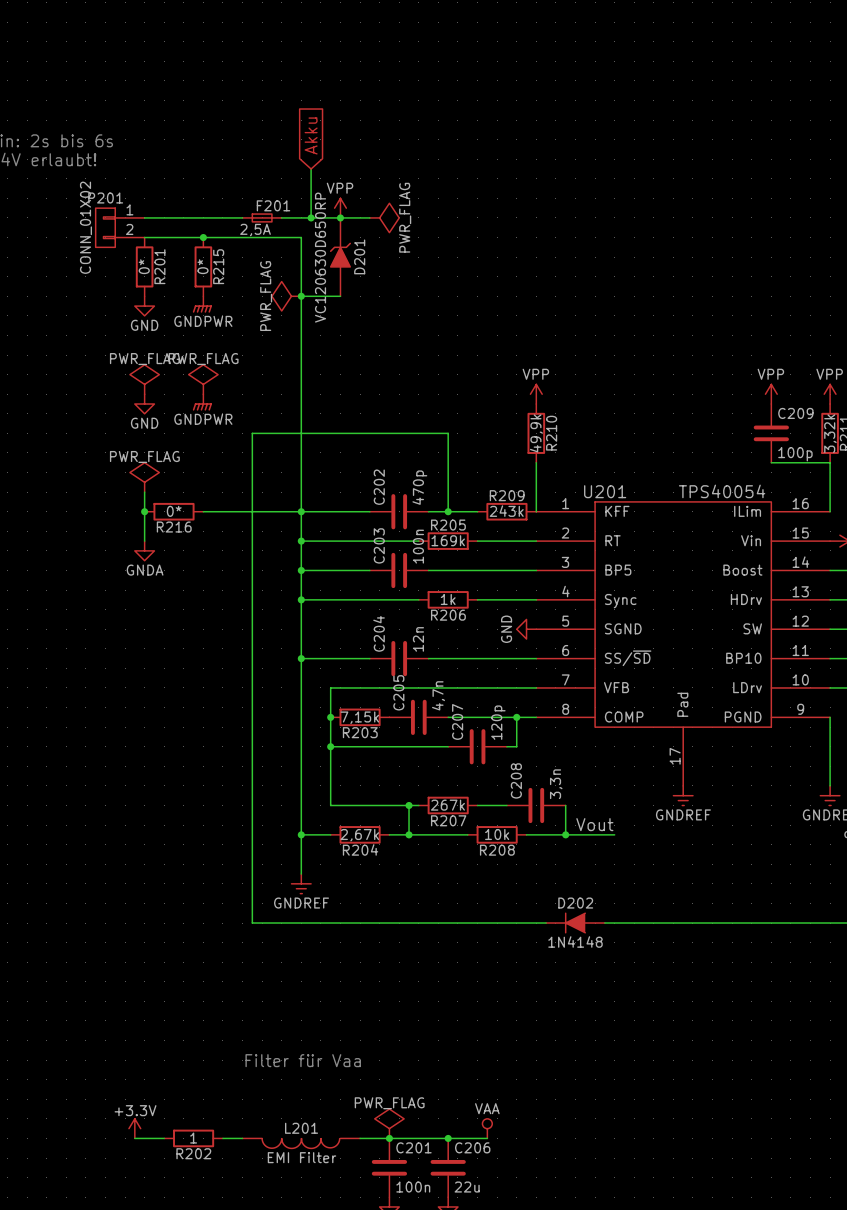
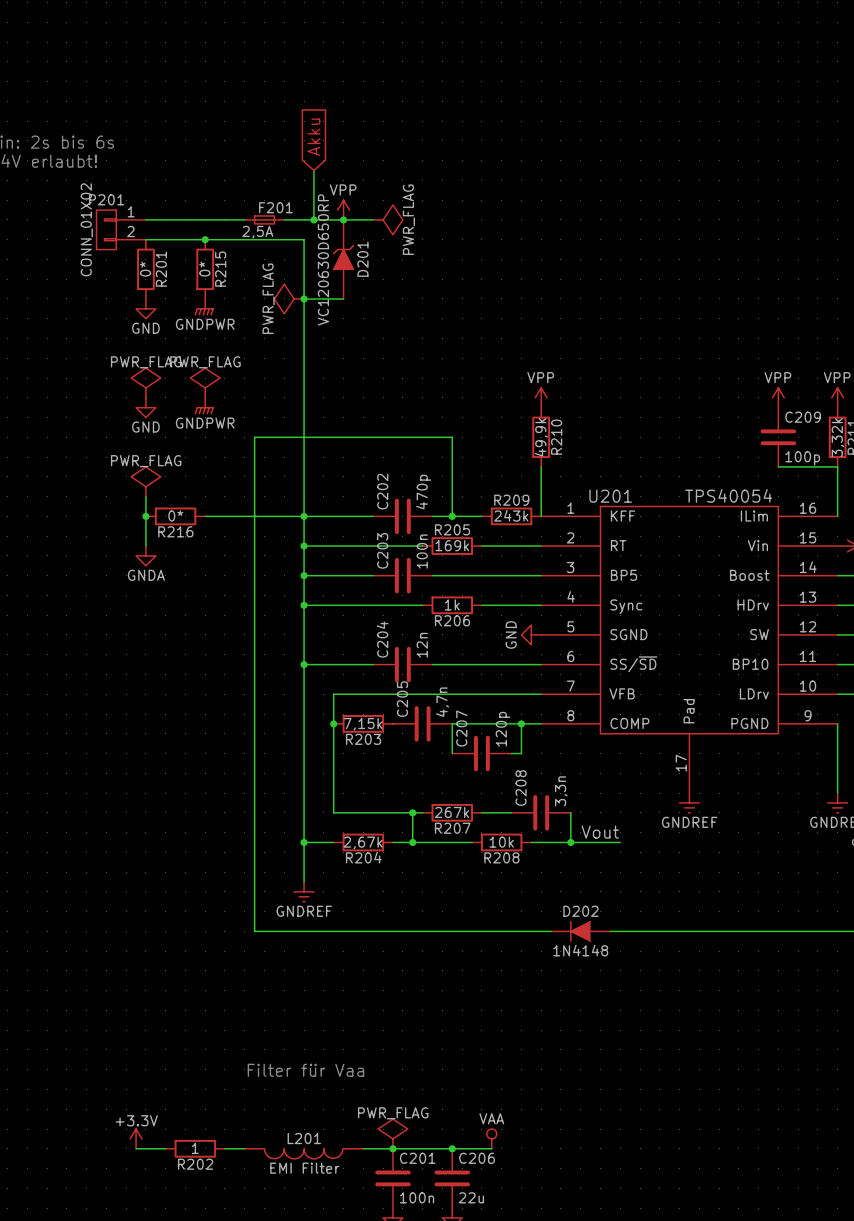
wire: (330, 746) (448, 746) -> (452, 723) (452, 753)
junction: (330, 746) -> none

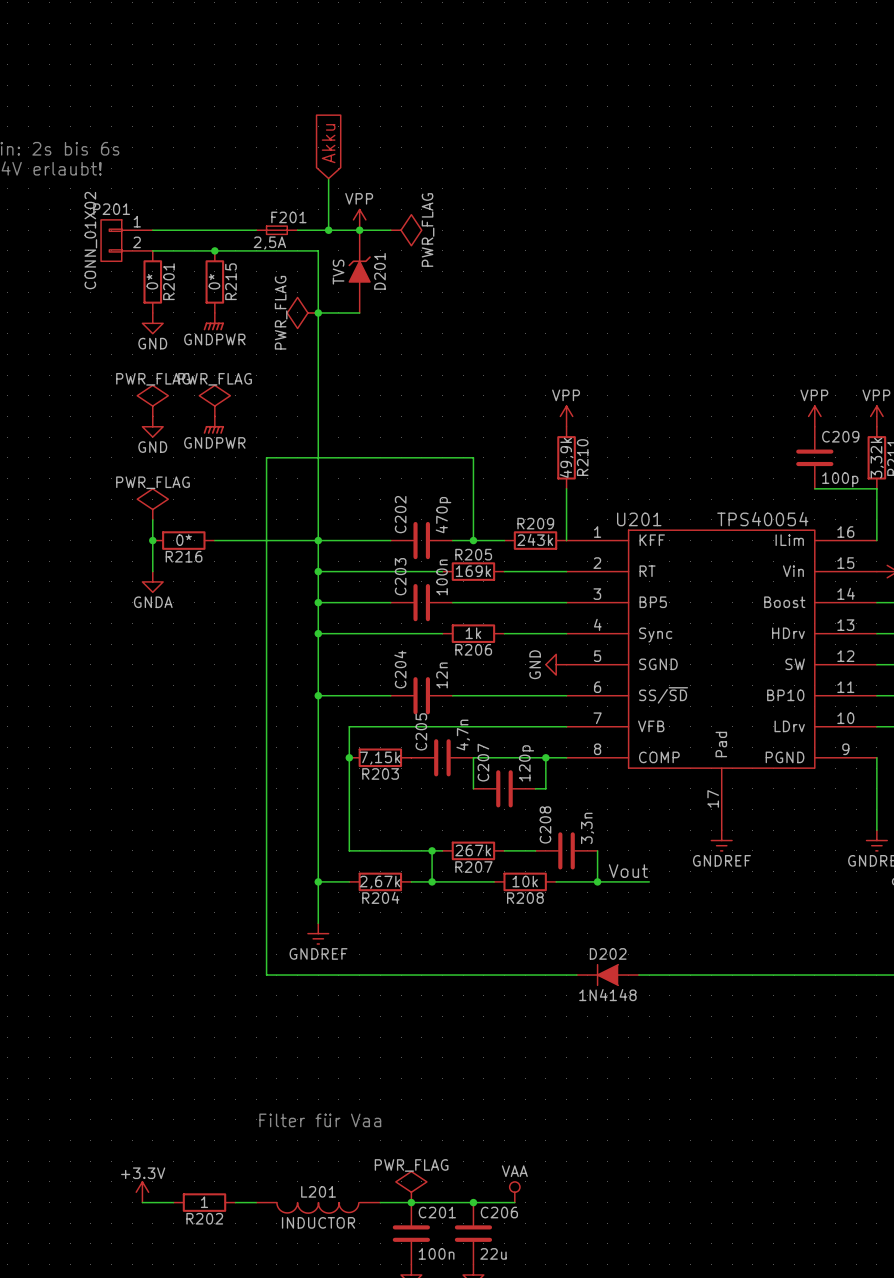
D201 value: VC120630D650RP (323, 259) -> TVS (338, 272)
L201 value: EMI Filter (304, 1168) -> INDUCTOR (318, 1222)

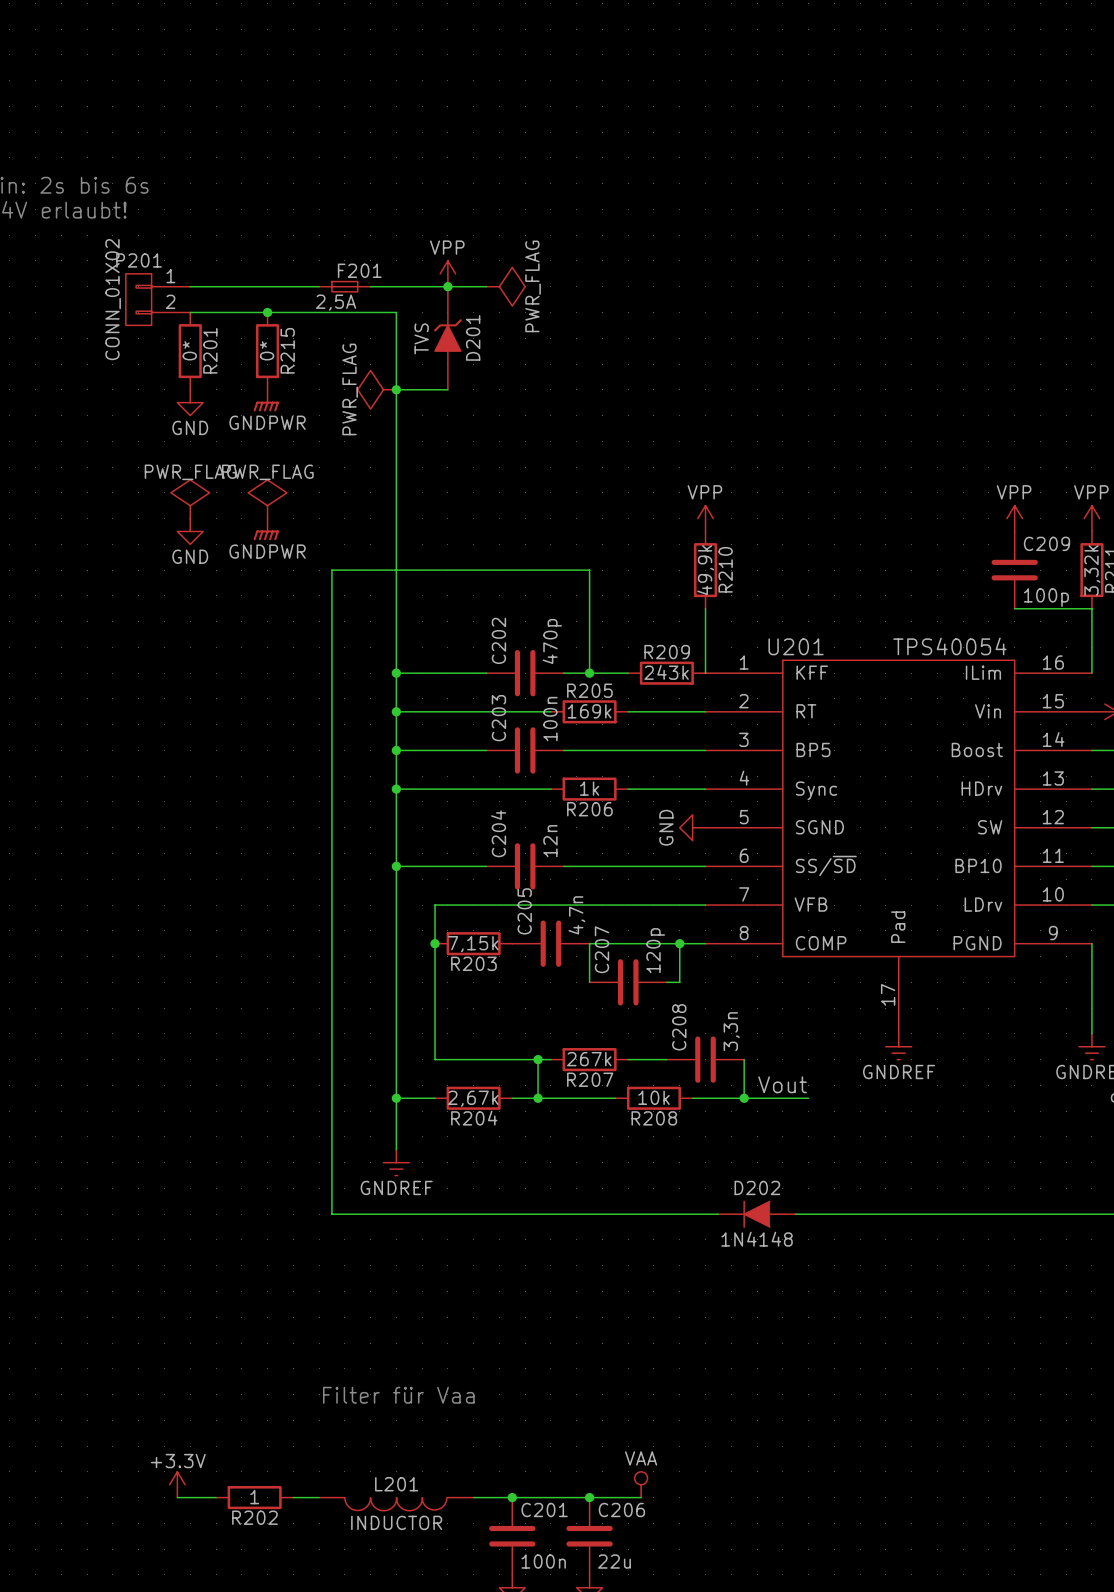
global label: Akku (328, 143) -> none
wire: (328, 178) (328, 230) -> none
junction: (328, 230) -> none
power symbol: PWR_FLAG (152, 504) -> none
wire: (152, 519) (152, 571) -> none
junction: (152, 540) -> none
R216: 0* (183, 540) -> none
wire: (214, 540) (318, 540) -> none
power symbol: GNDA (152, 581) -> none
power symbol: PWR_FLAG (411, 1187) -> none

